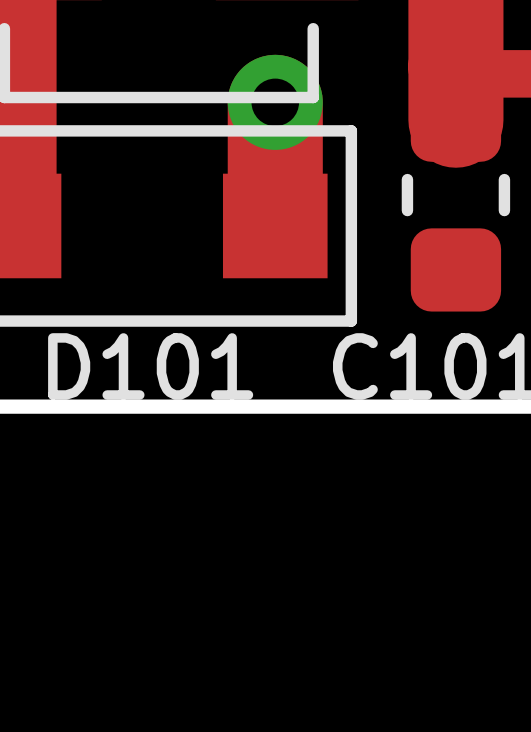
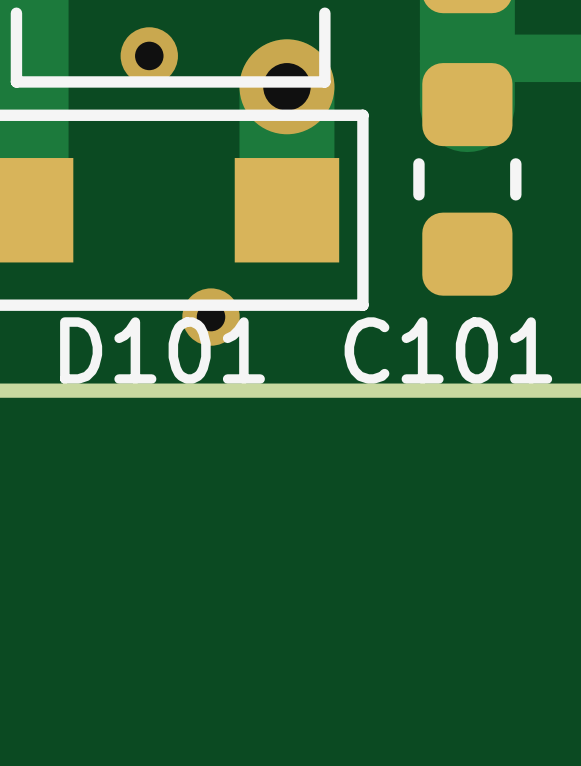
via: none -> (149, 55)
via: none -> (211, 317)

